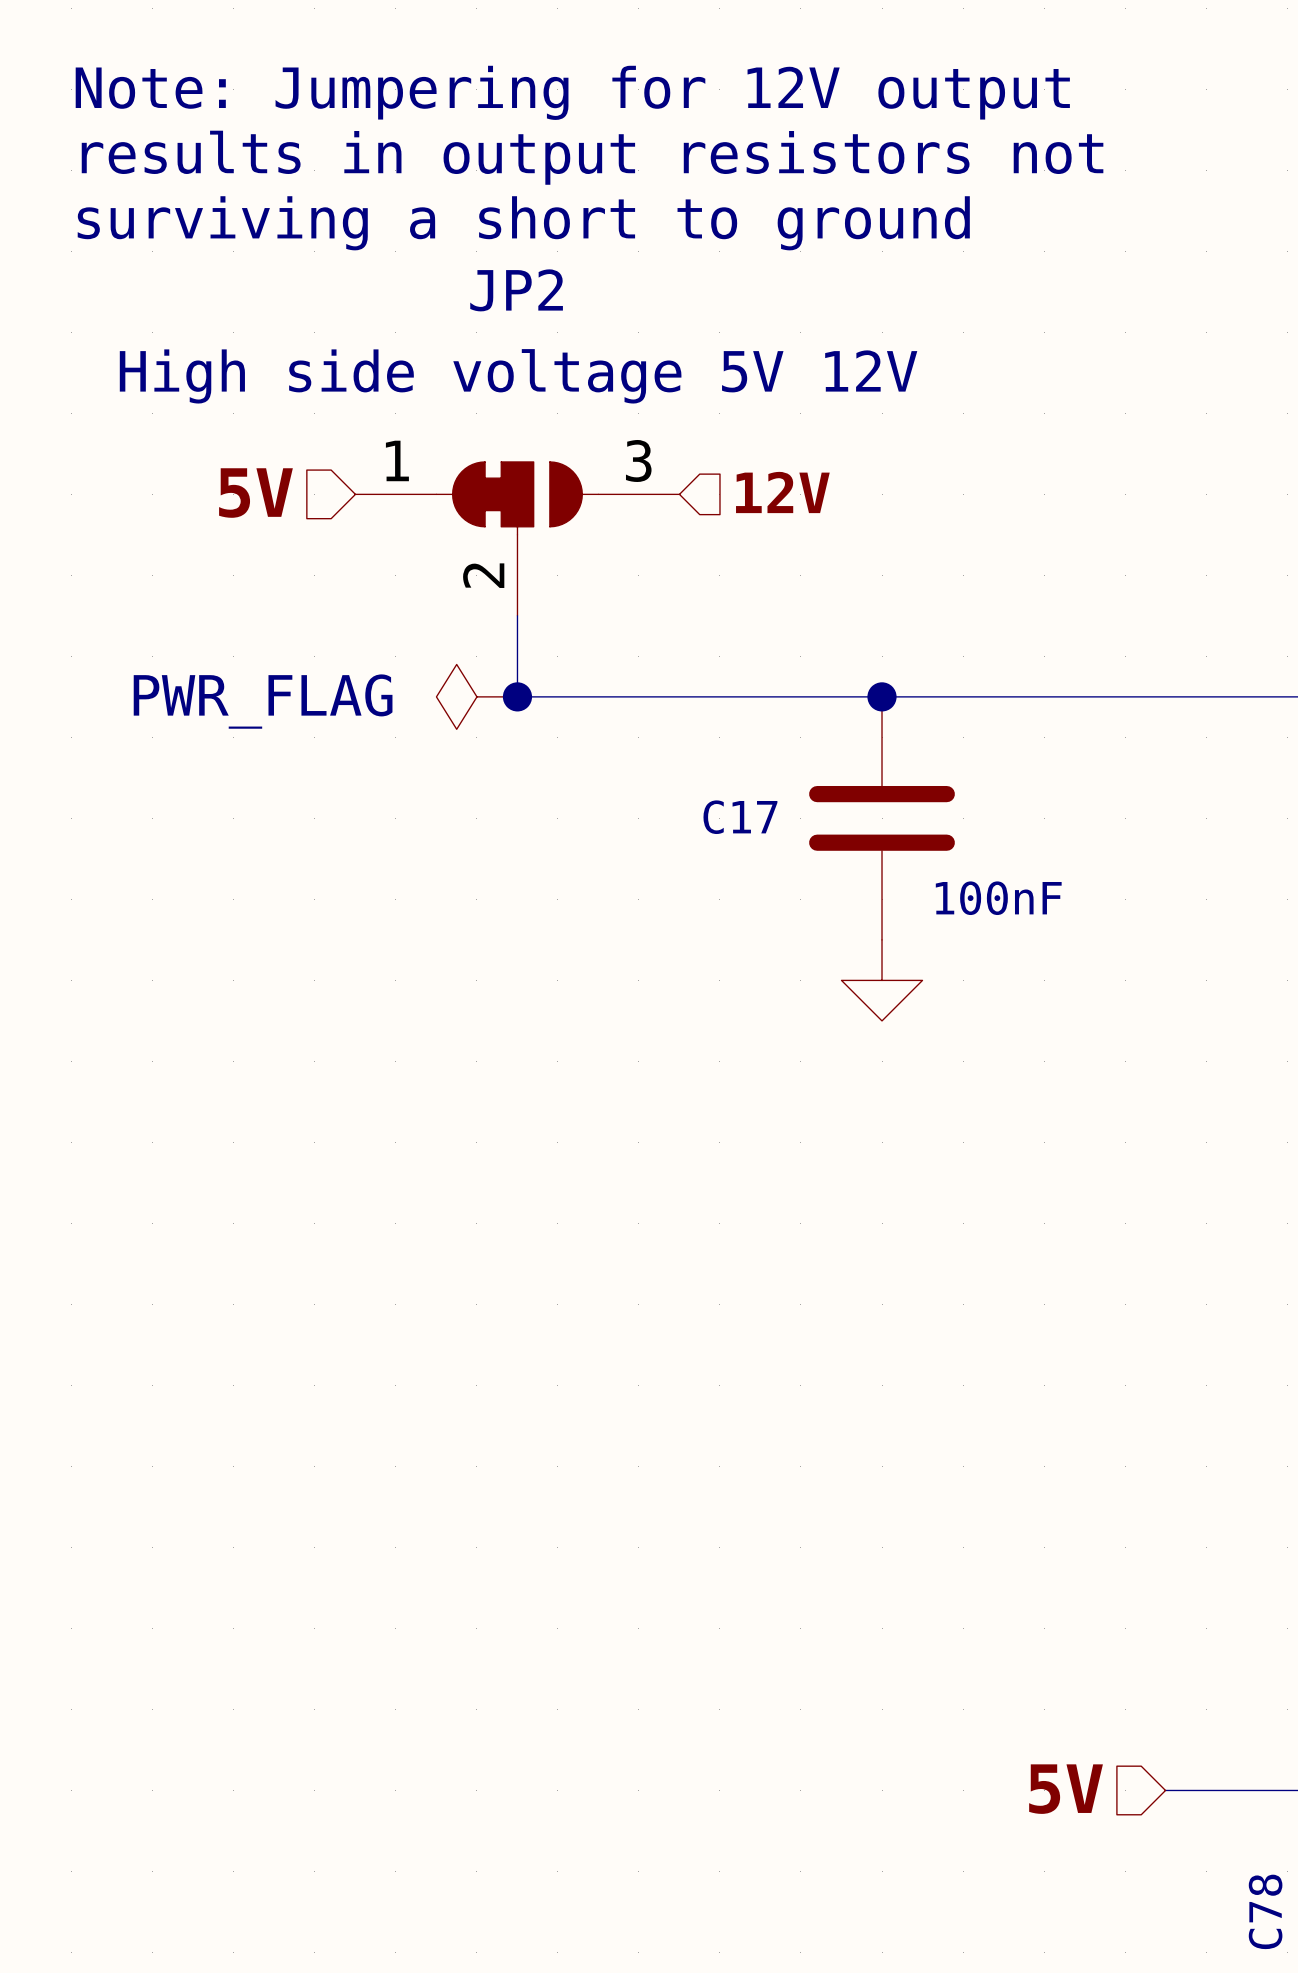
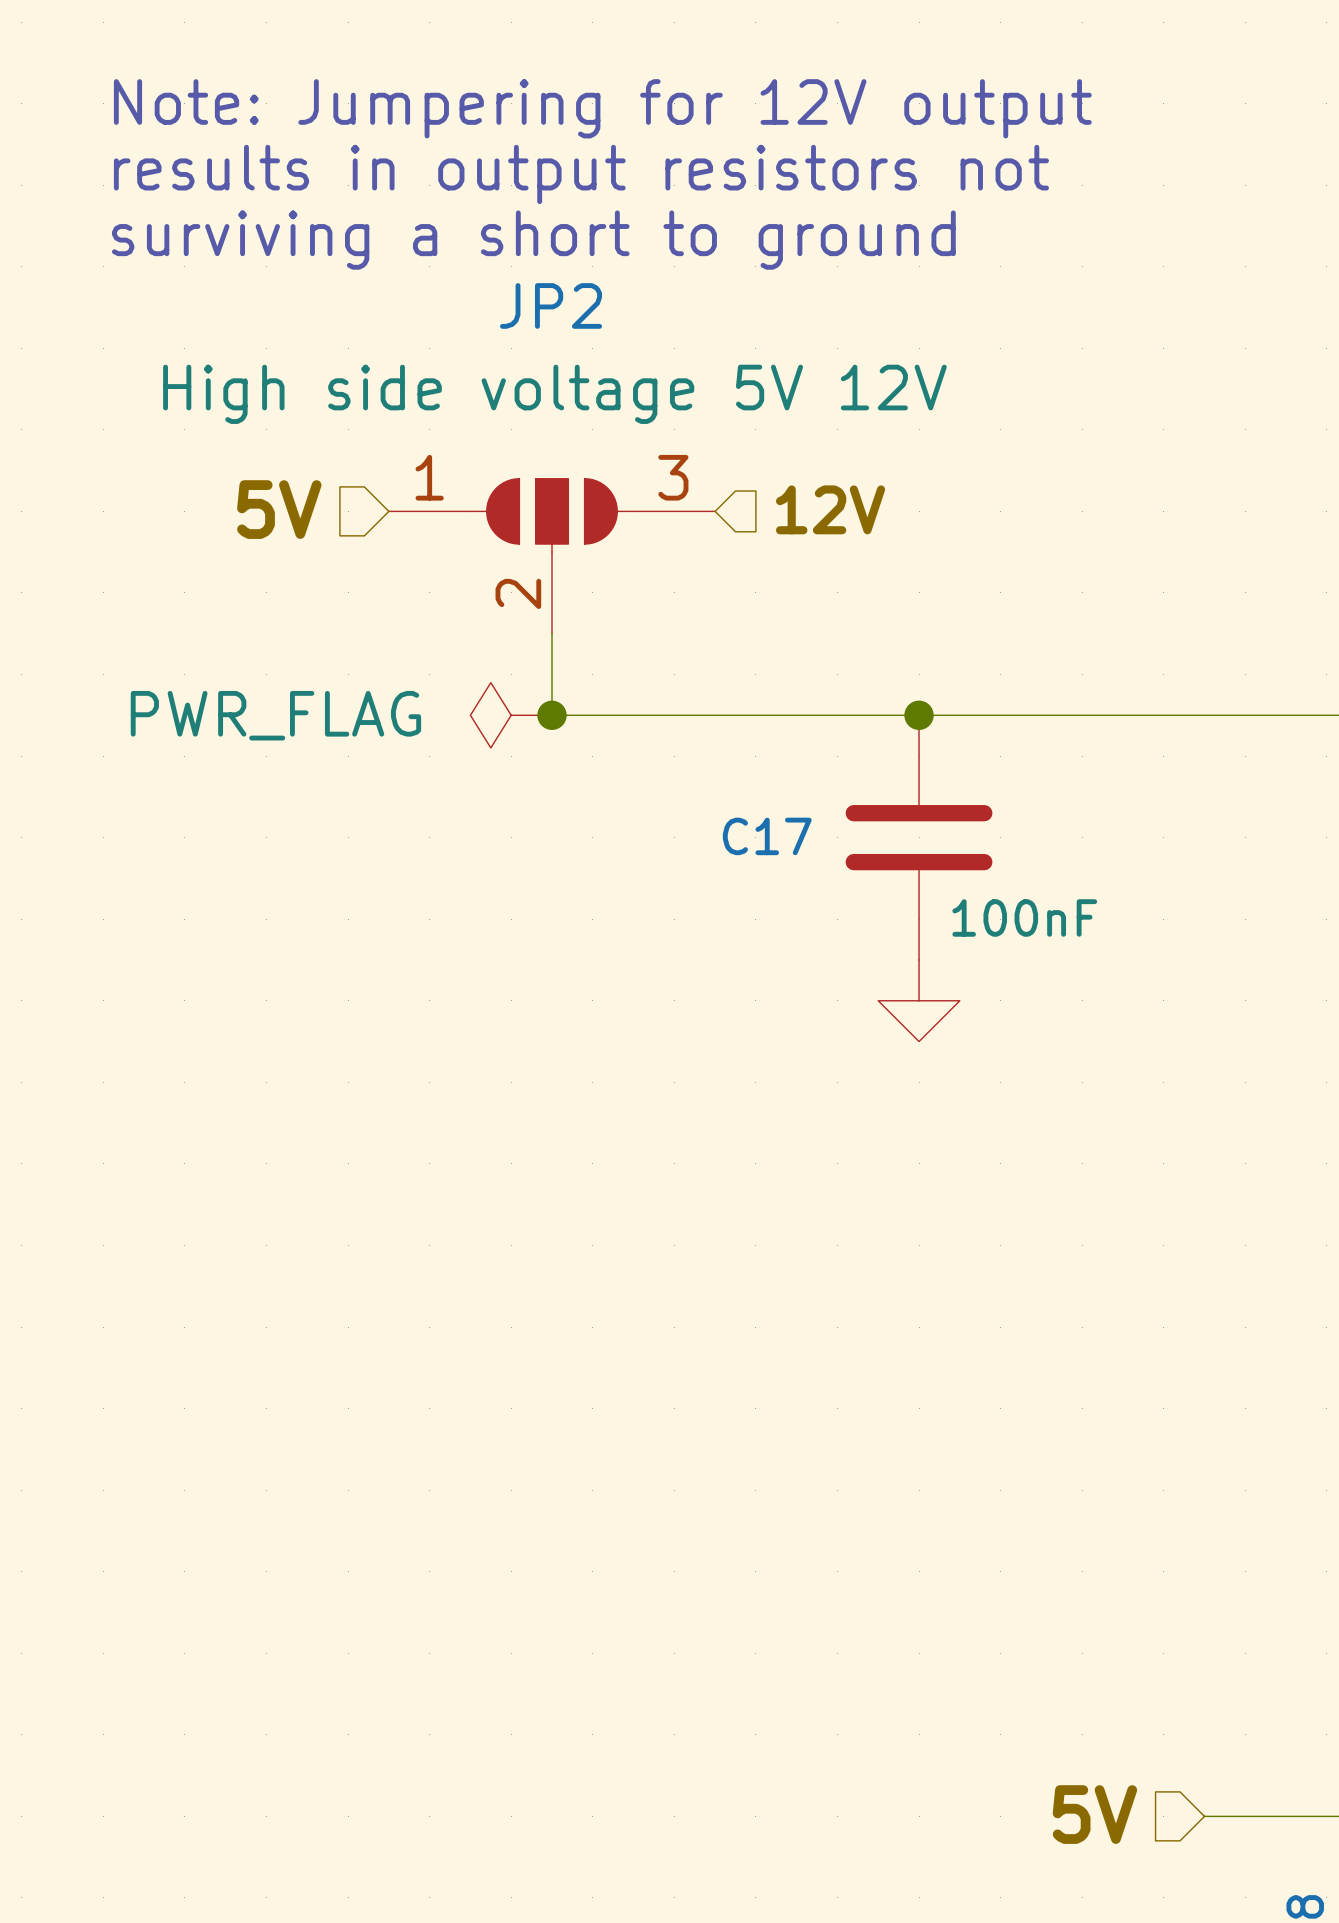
JP2 symbol: [355, 461, 680, 616] -> [388, 478, 716, 634]

